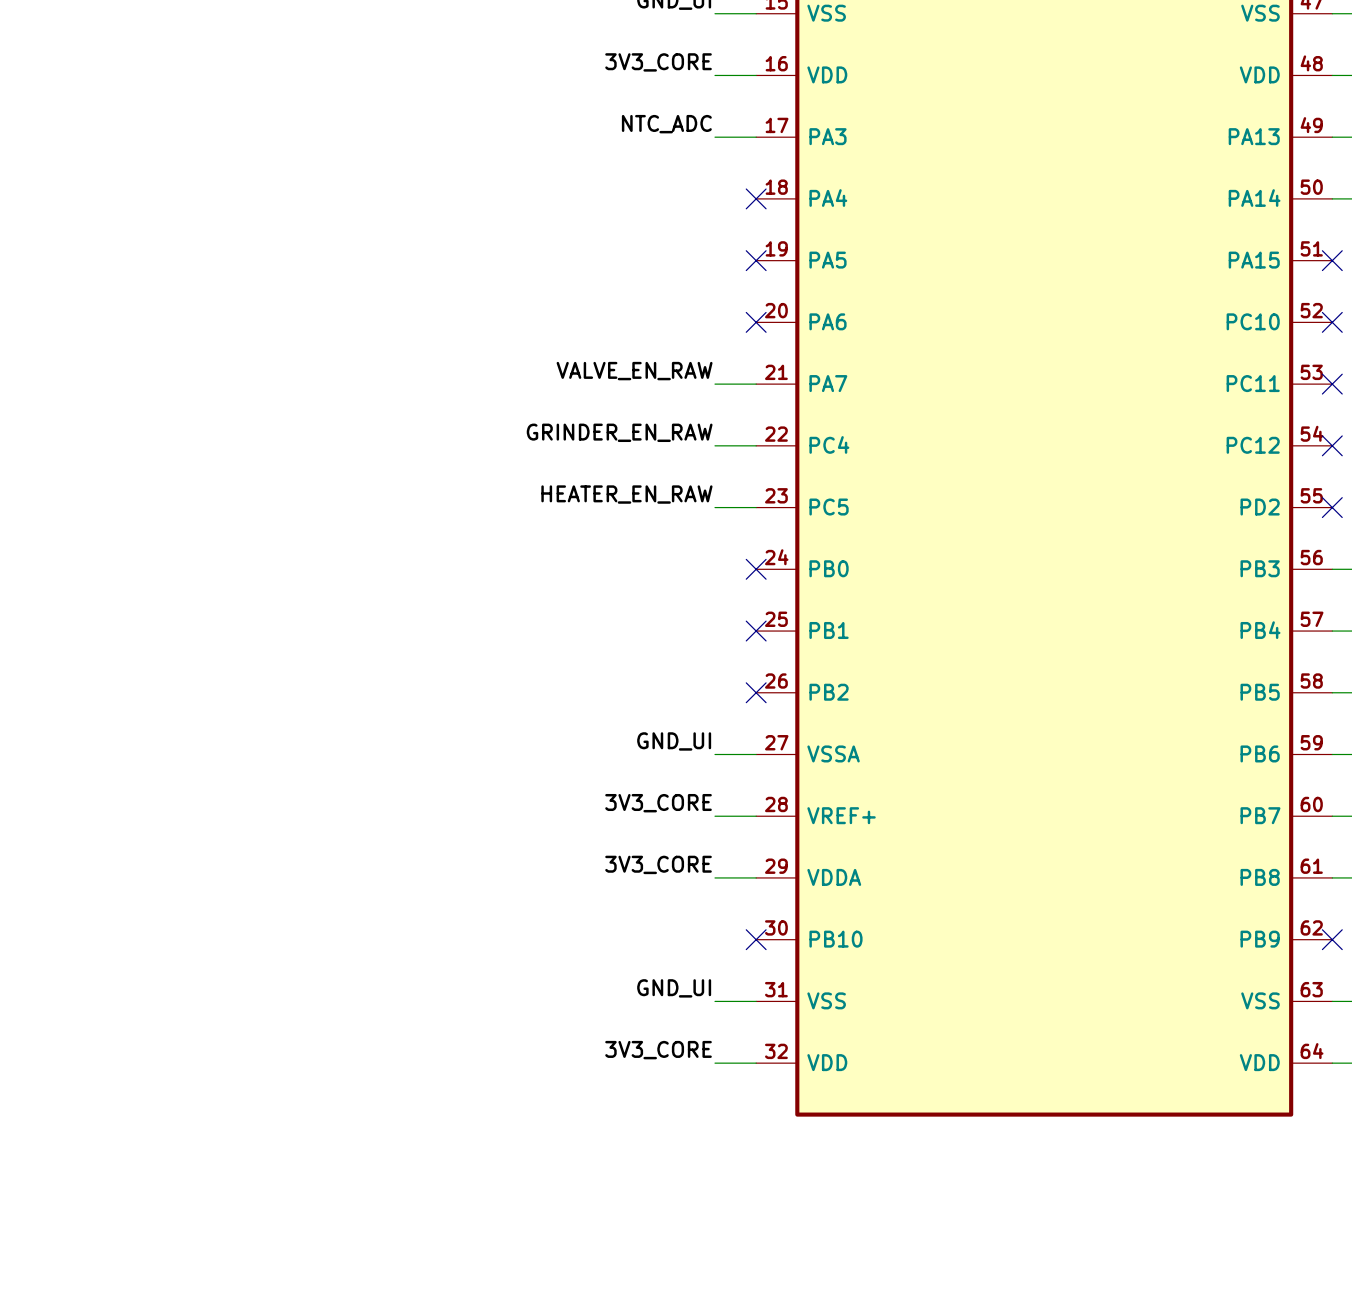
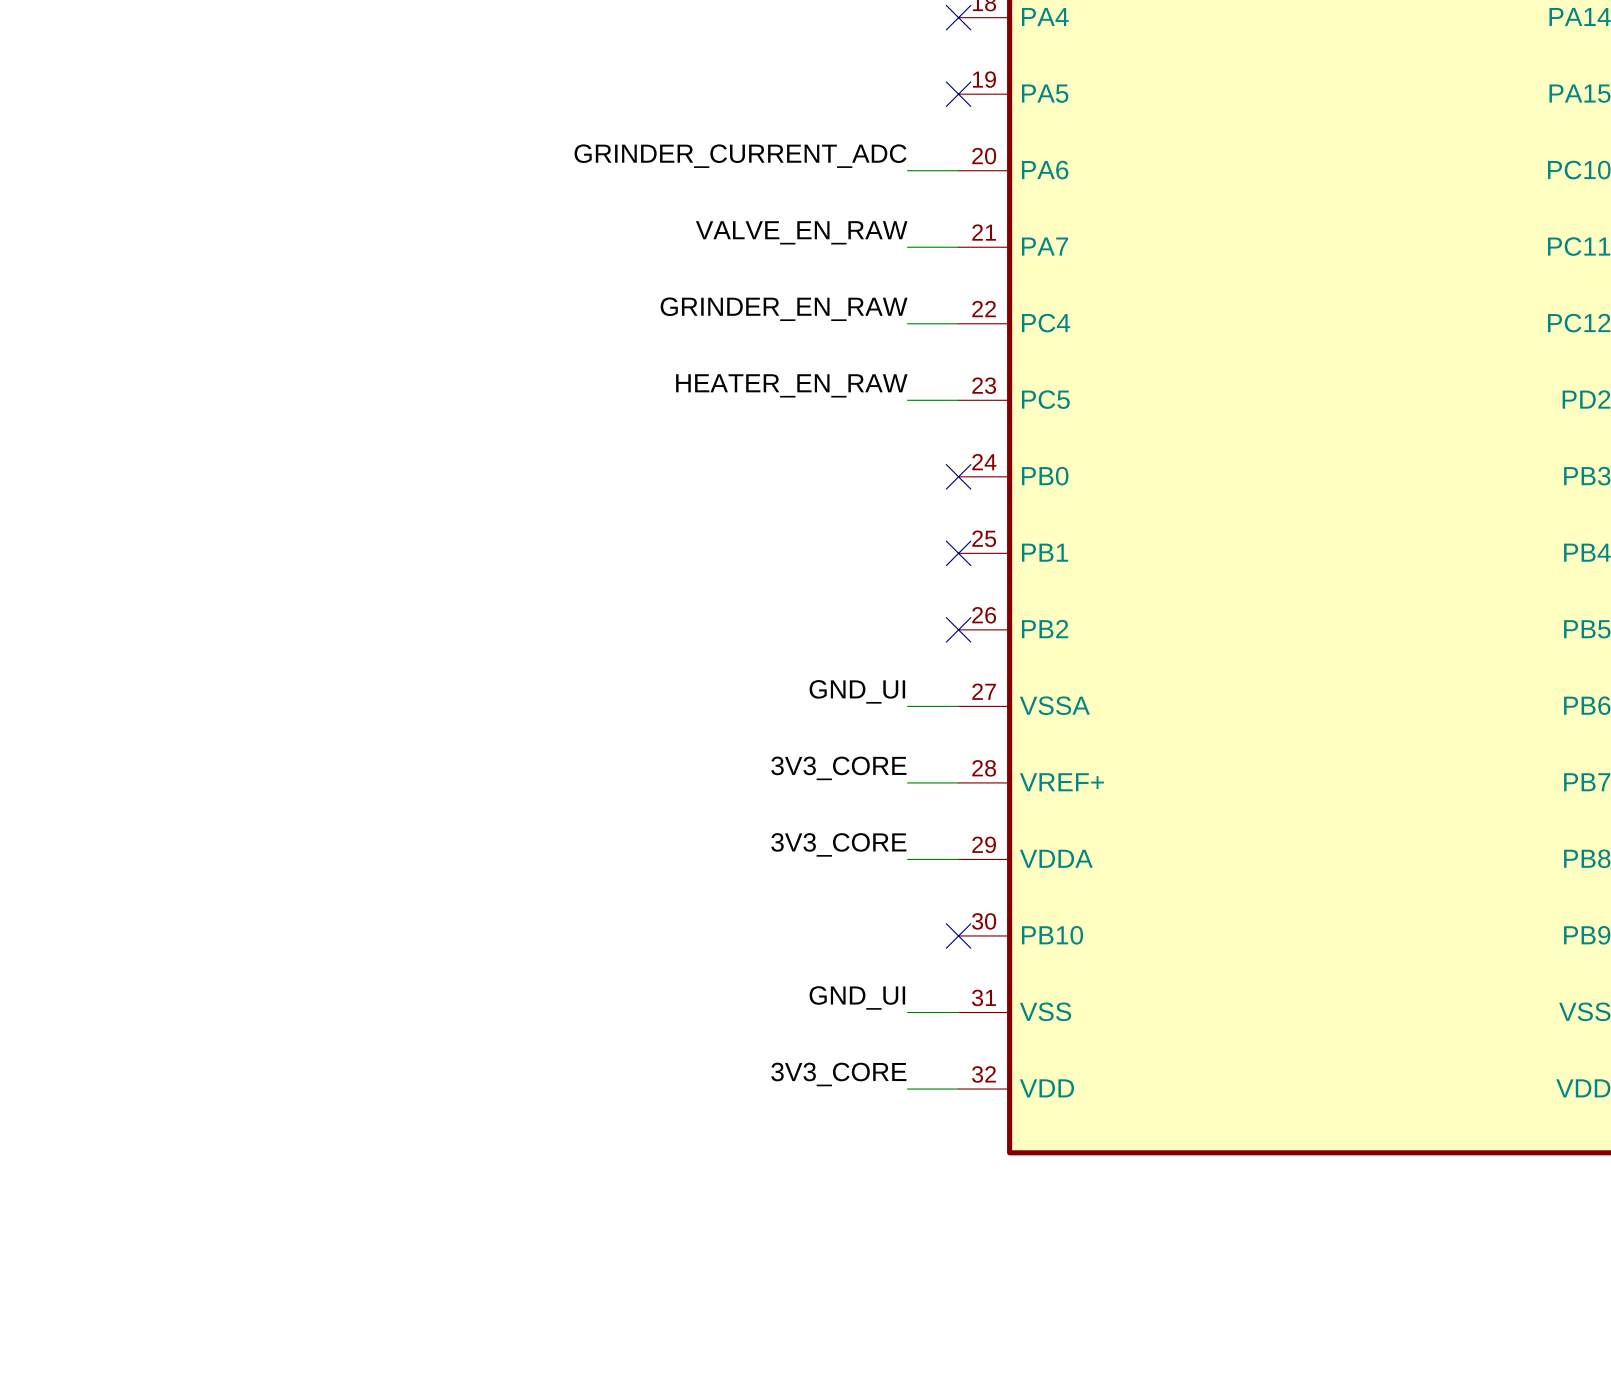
label: none -> GRINDER_CURRENT_ADC (740, 156)
wire: none -> (907, 170) (958, 170)
no-connect mark: (756, 322) -> none

